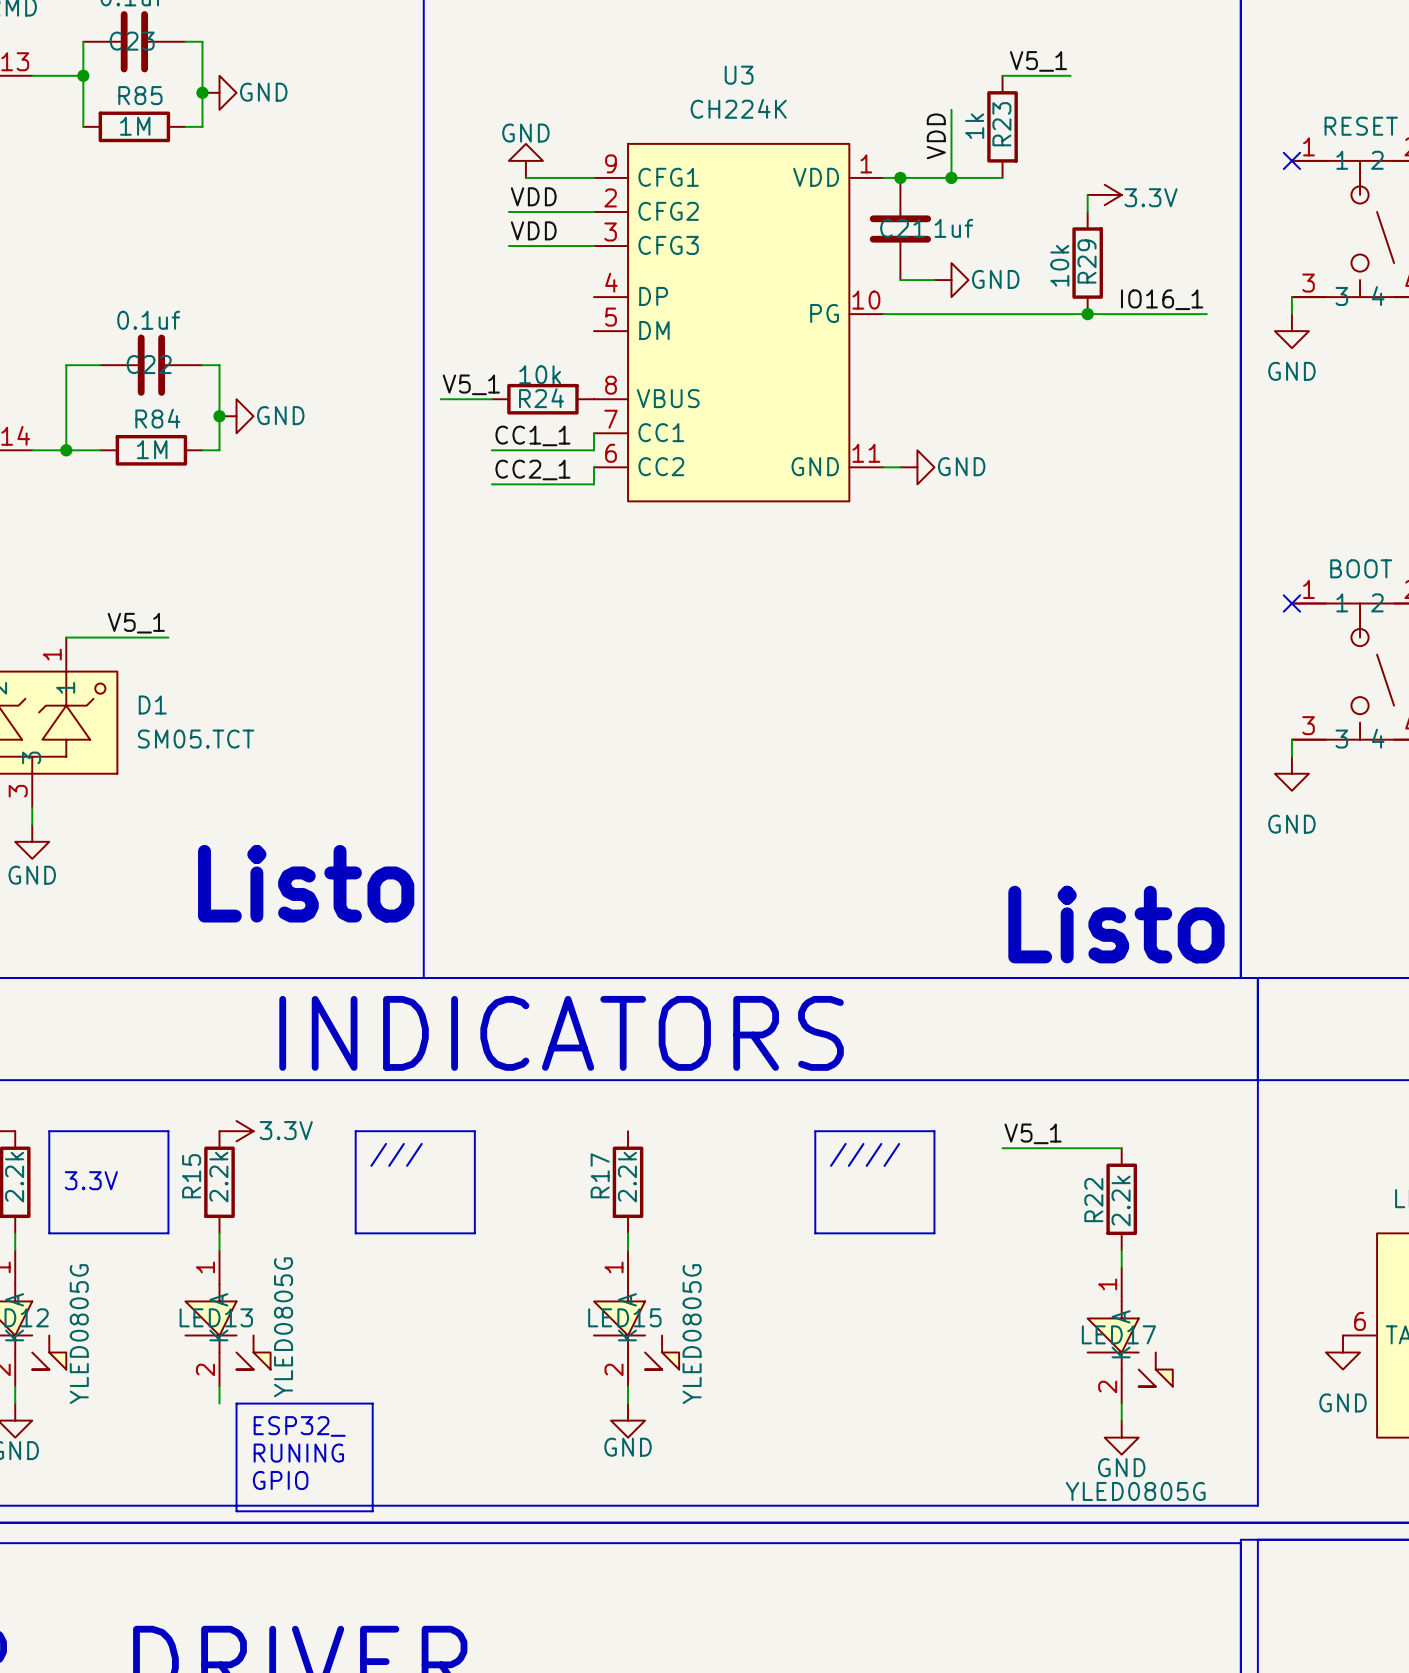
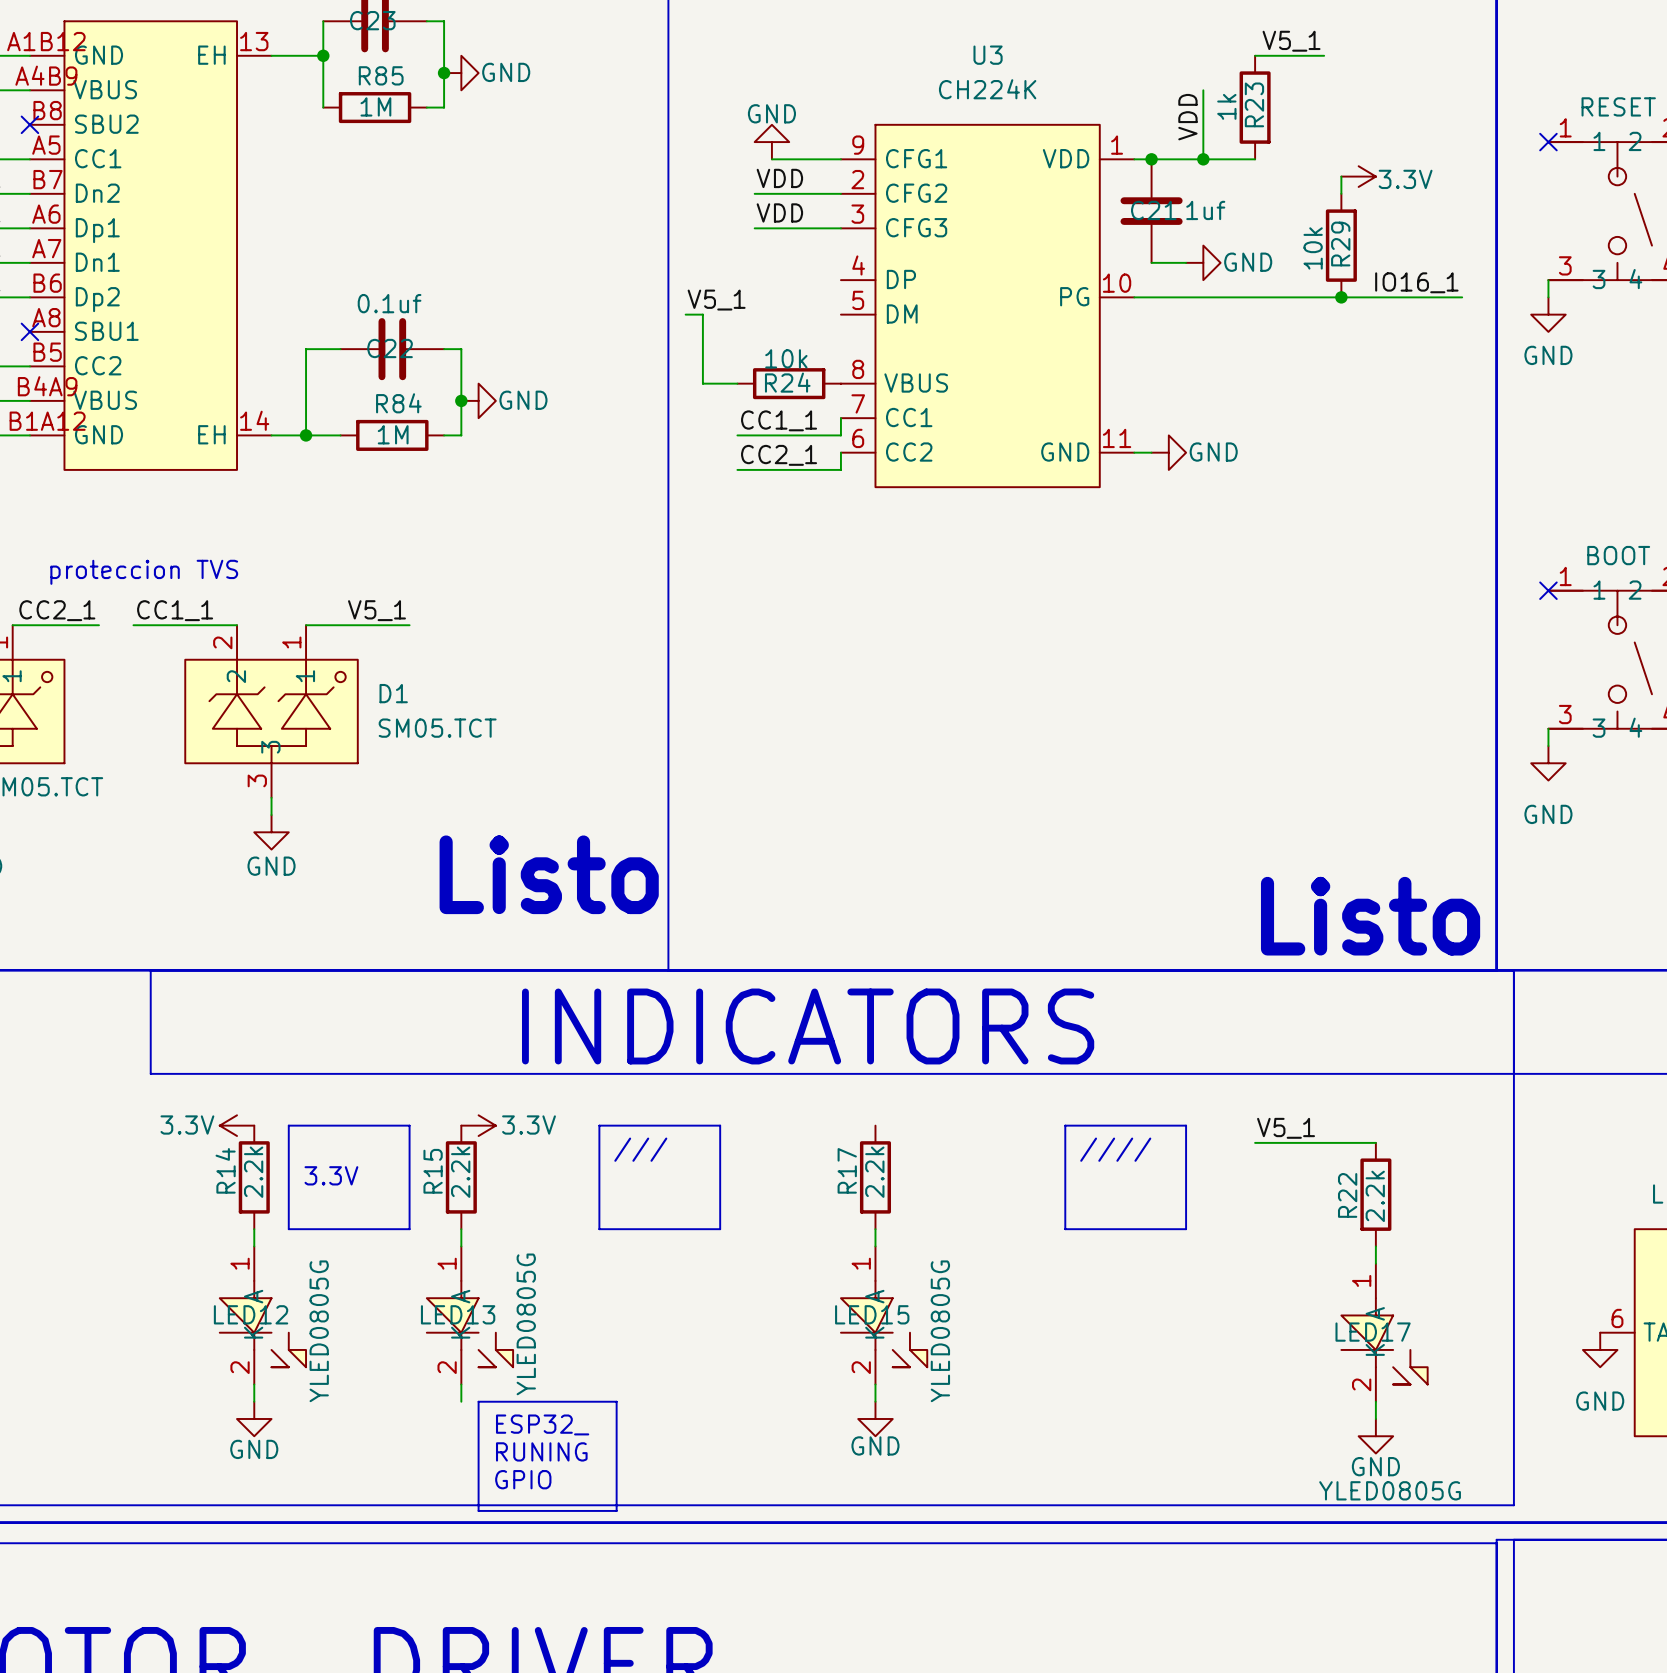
label position: V5_1 (471, 384) -> V5_1 (716, 300)
wire: (440, 399) (457, 399) -> (685, 314) (702, 314) (702, 383)

